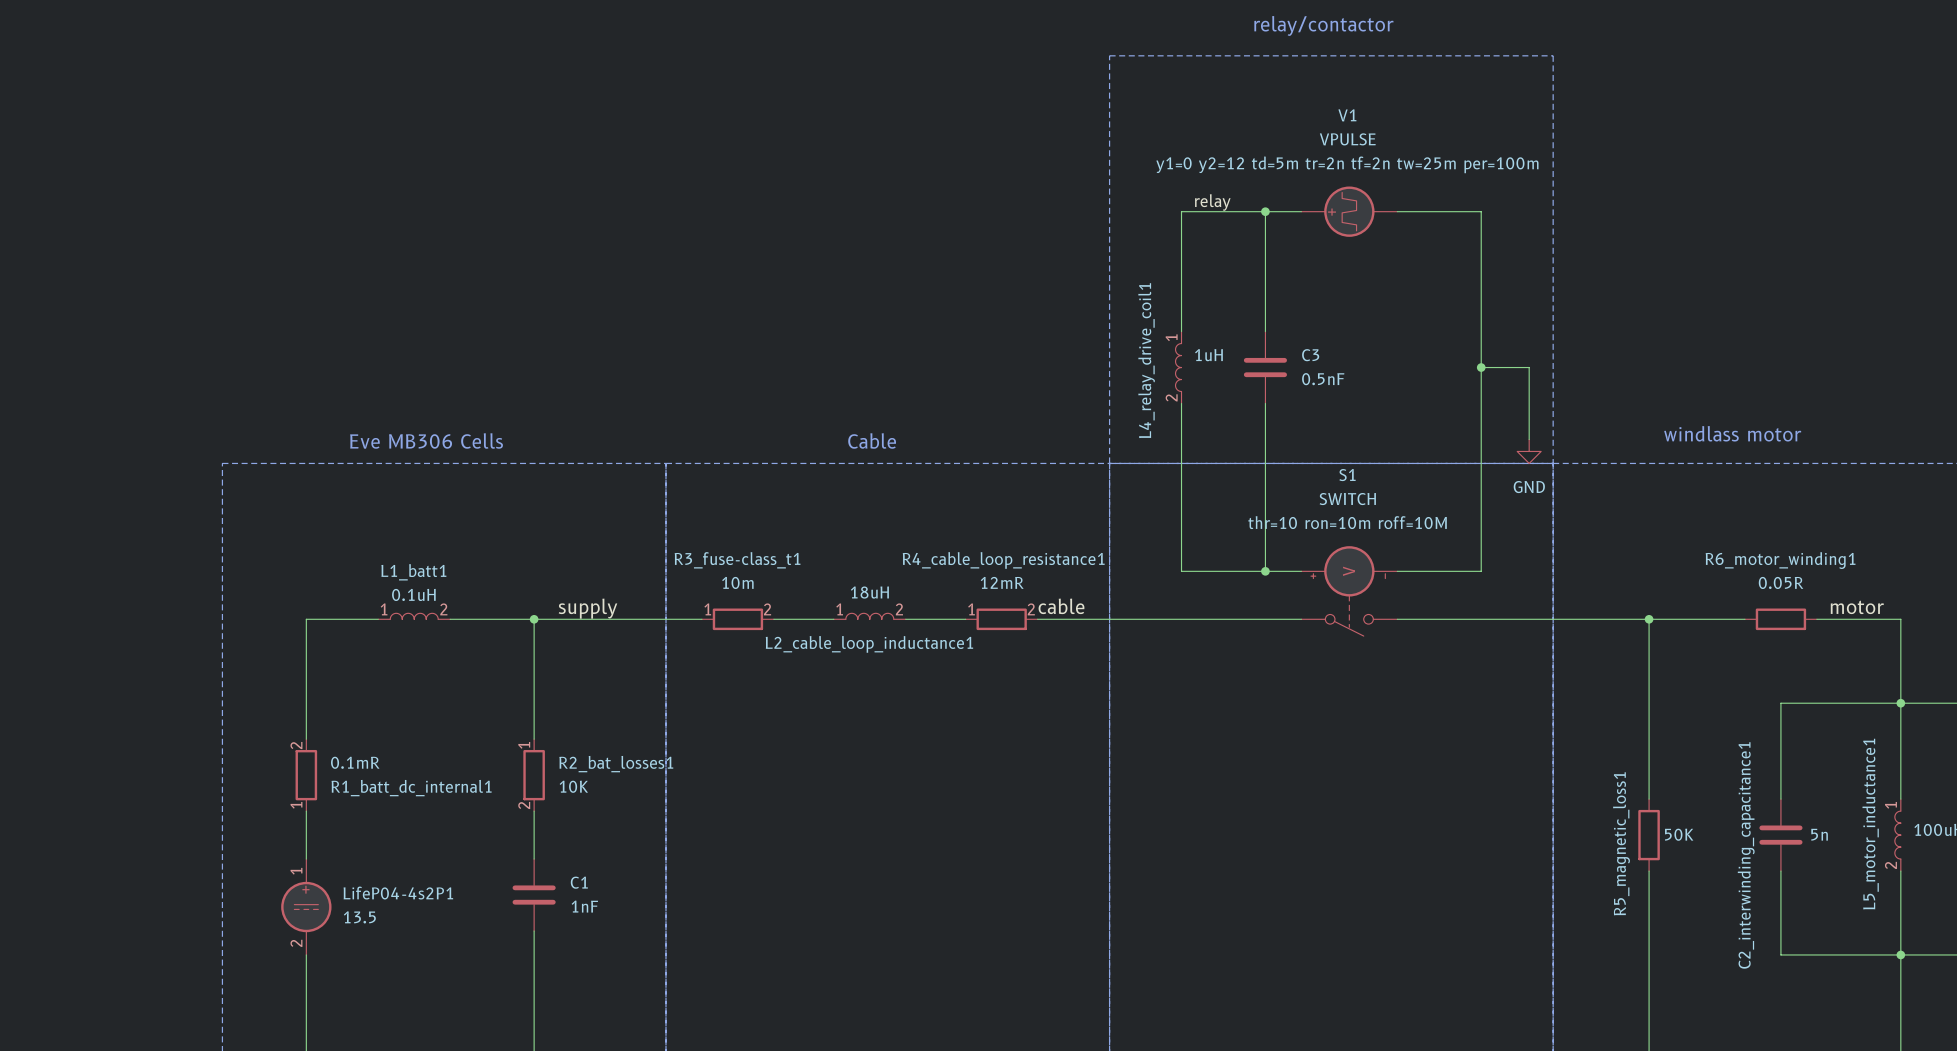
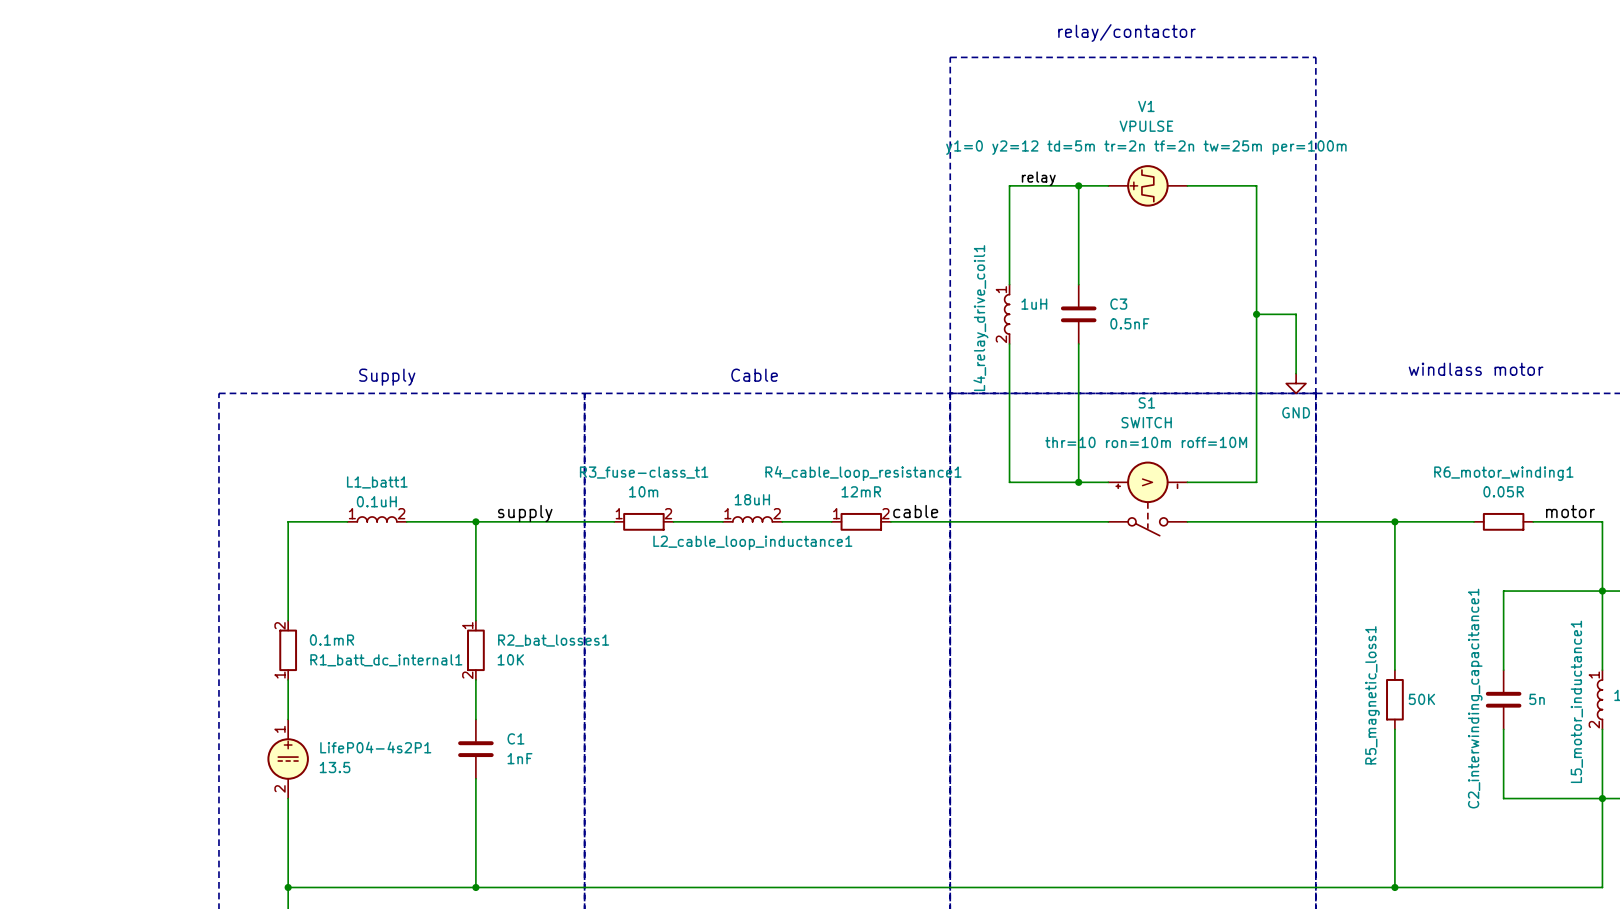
text: Eve MB306 Cells (426, 440) -> Supply (387, 377)

